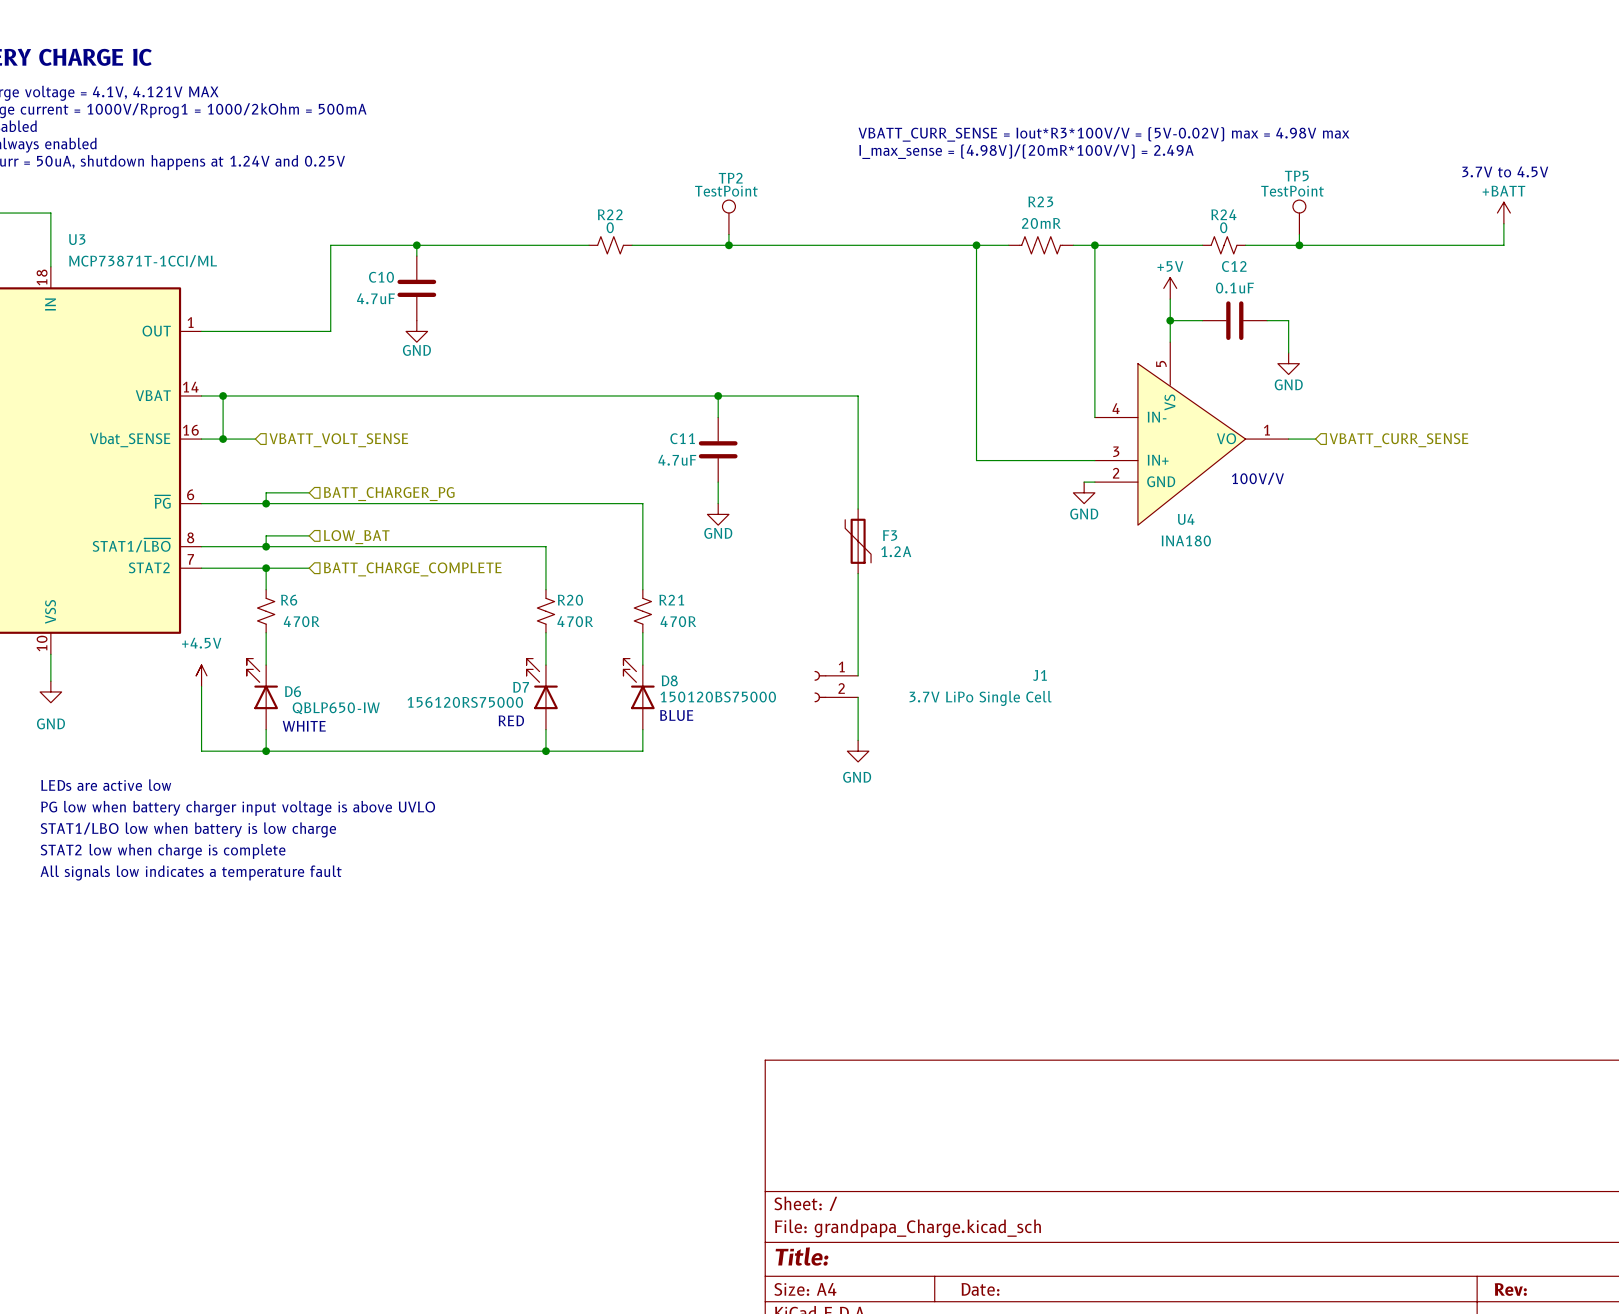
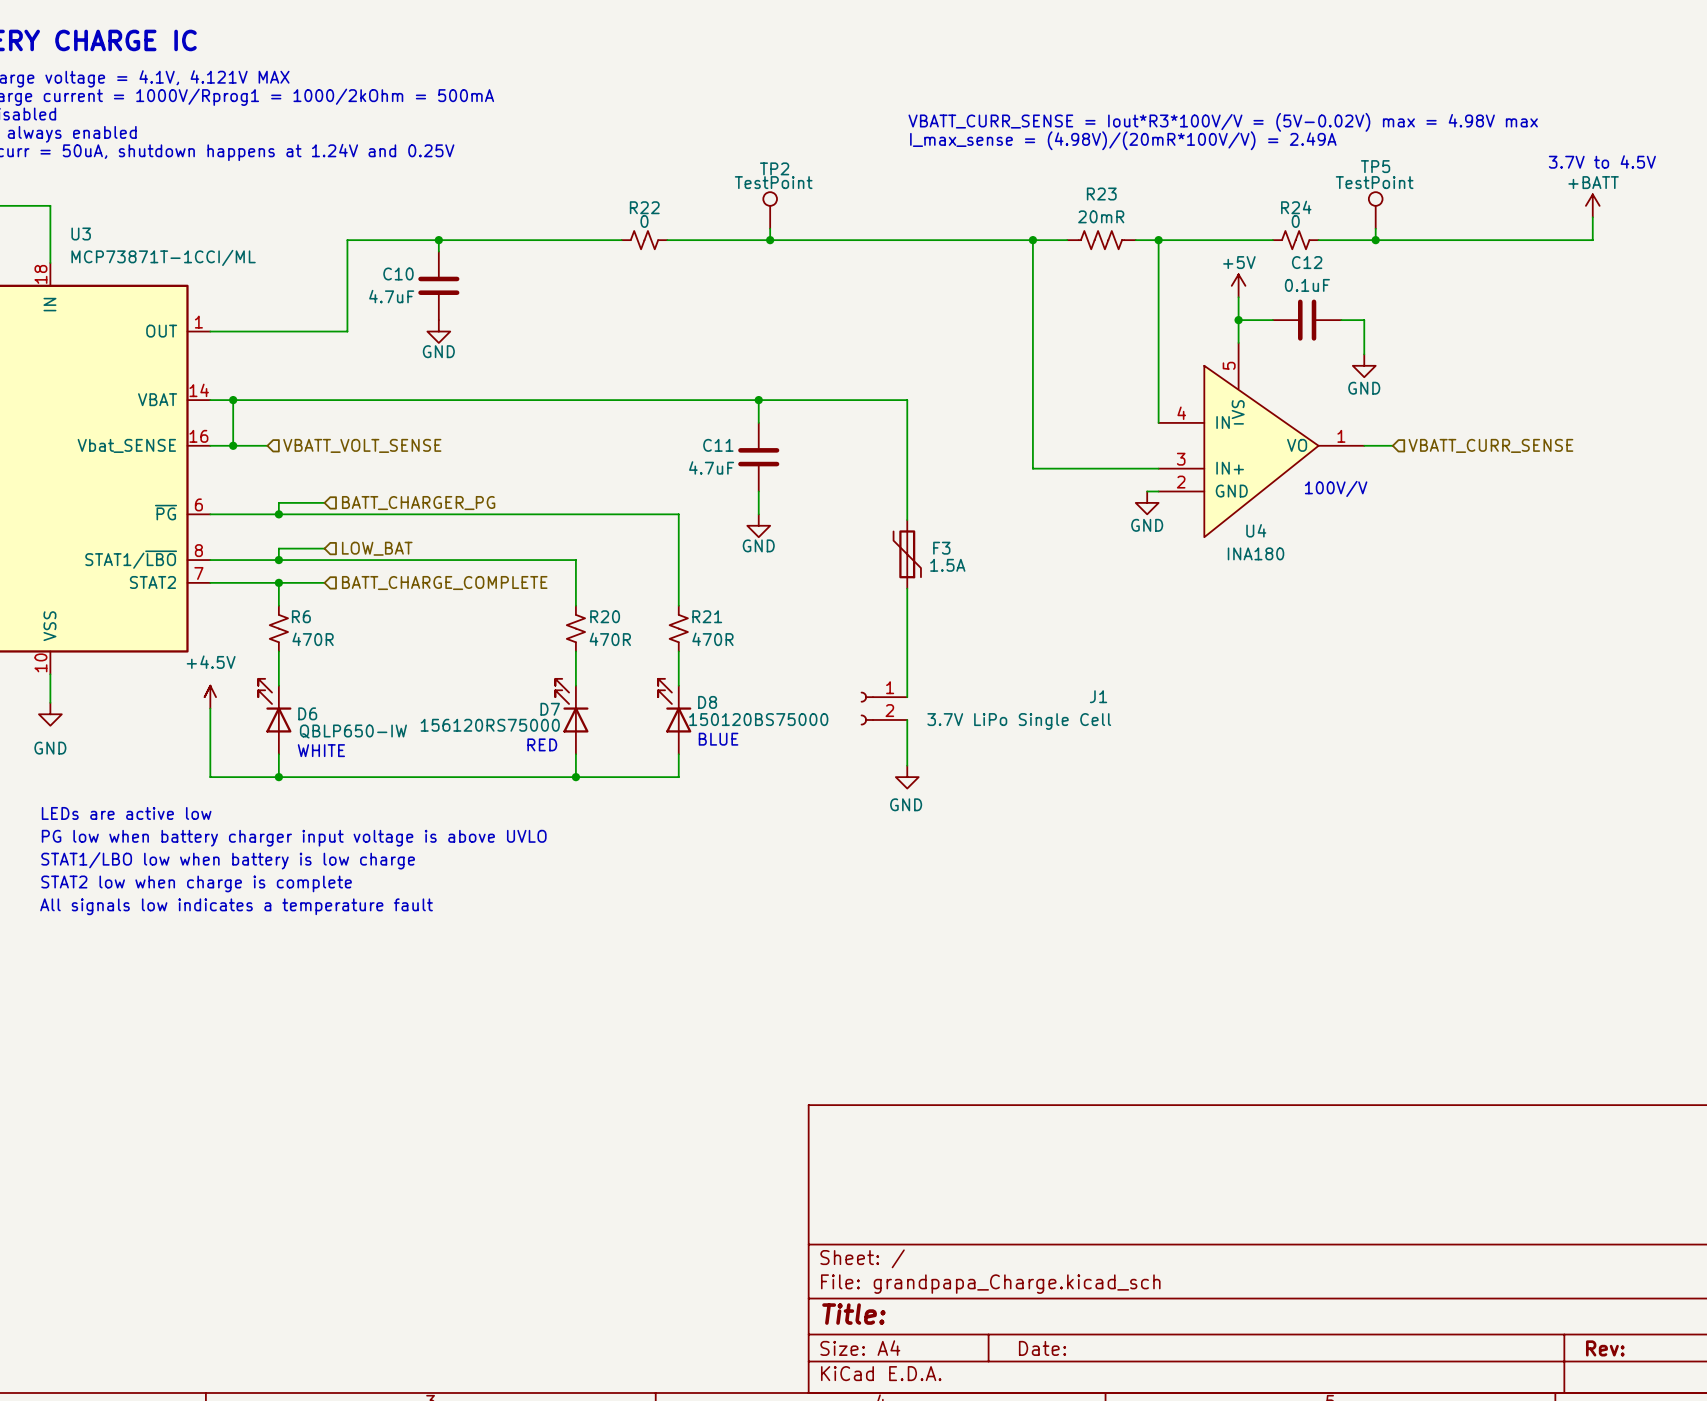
F3 value: 1.2A (896, 551) -> 1.5A (947, 565)

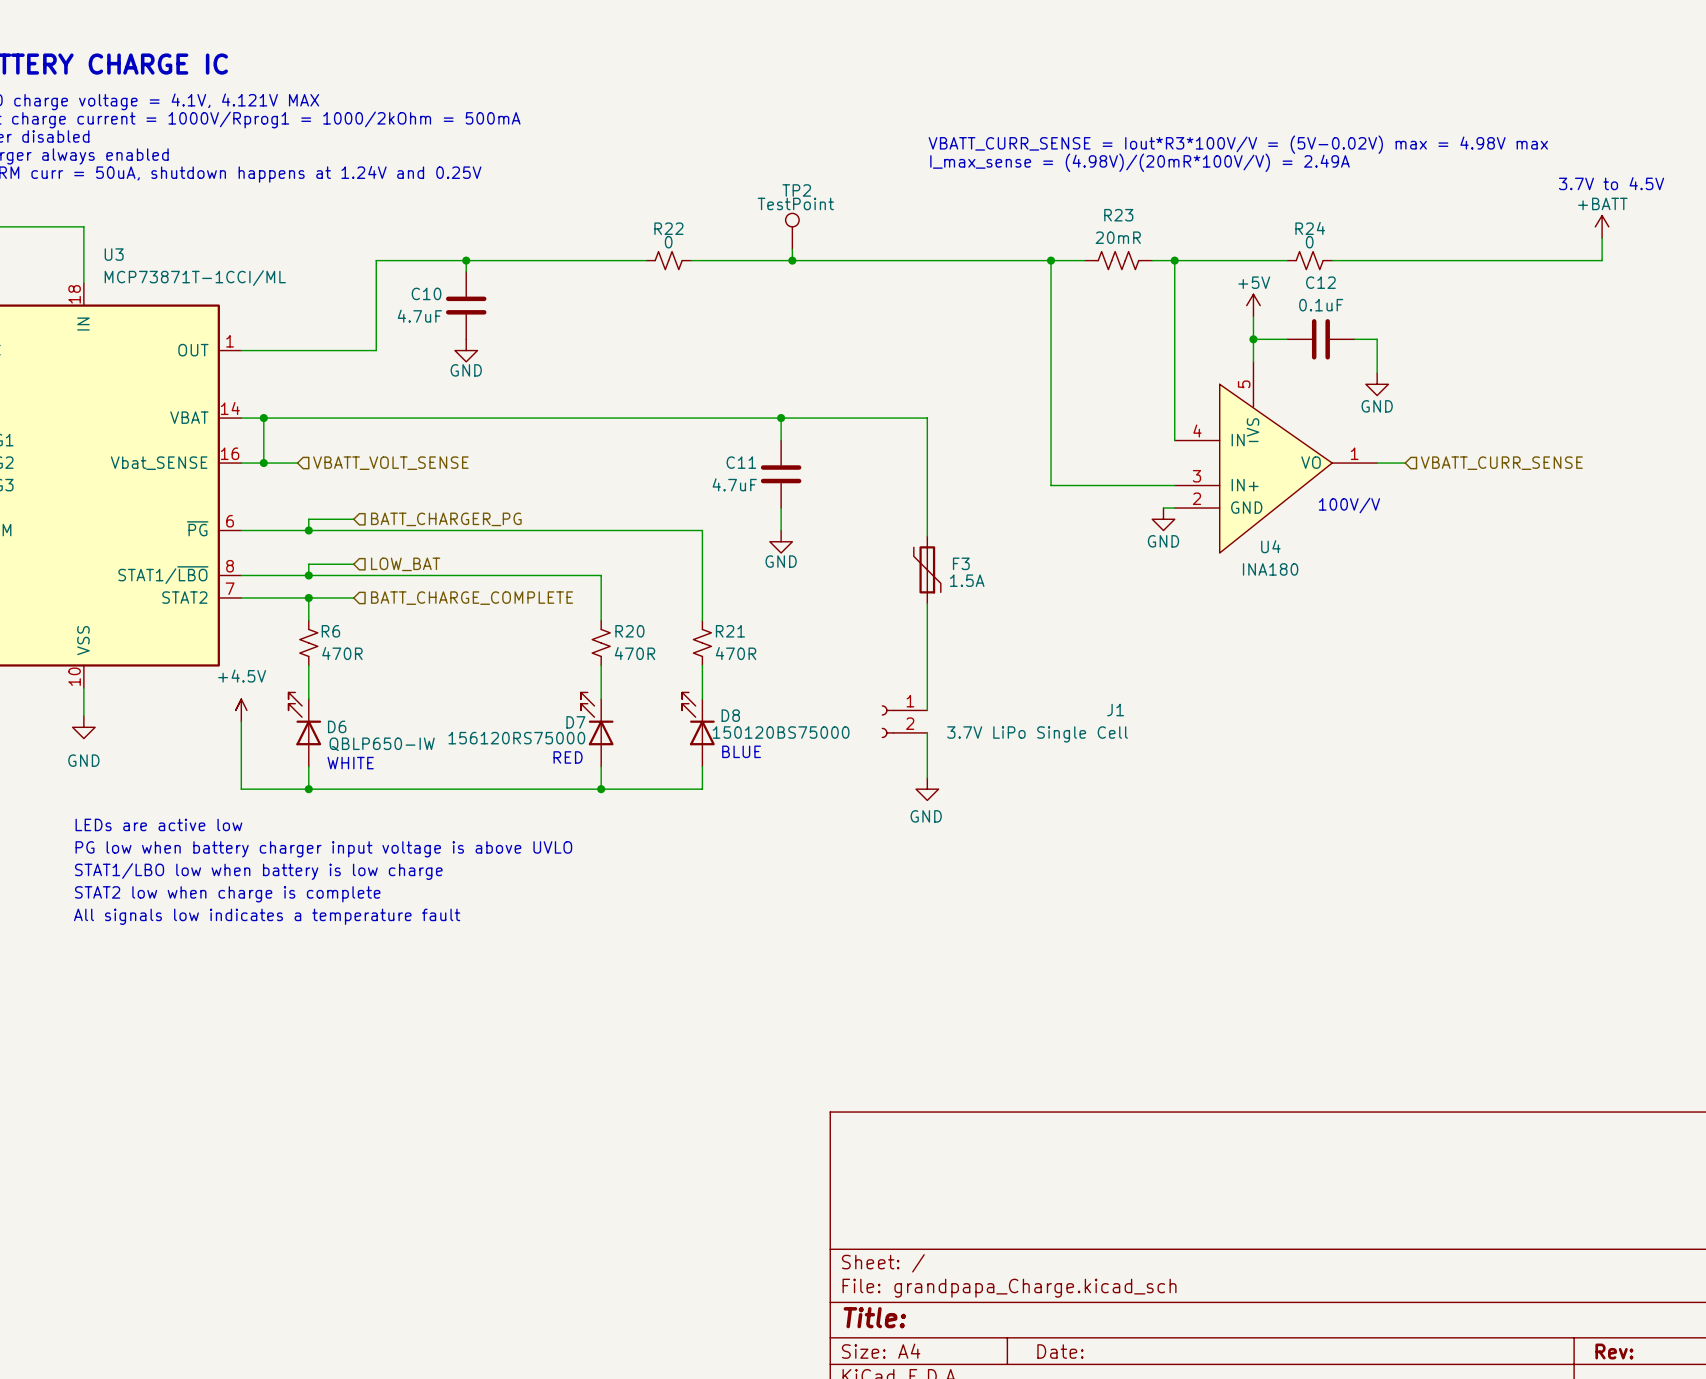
TP5: TestPoint (1375, 210) -> none
wire: (1375, 228) (1375, 240) -> none
junction: (1375, 240) -> none

